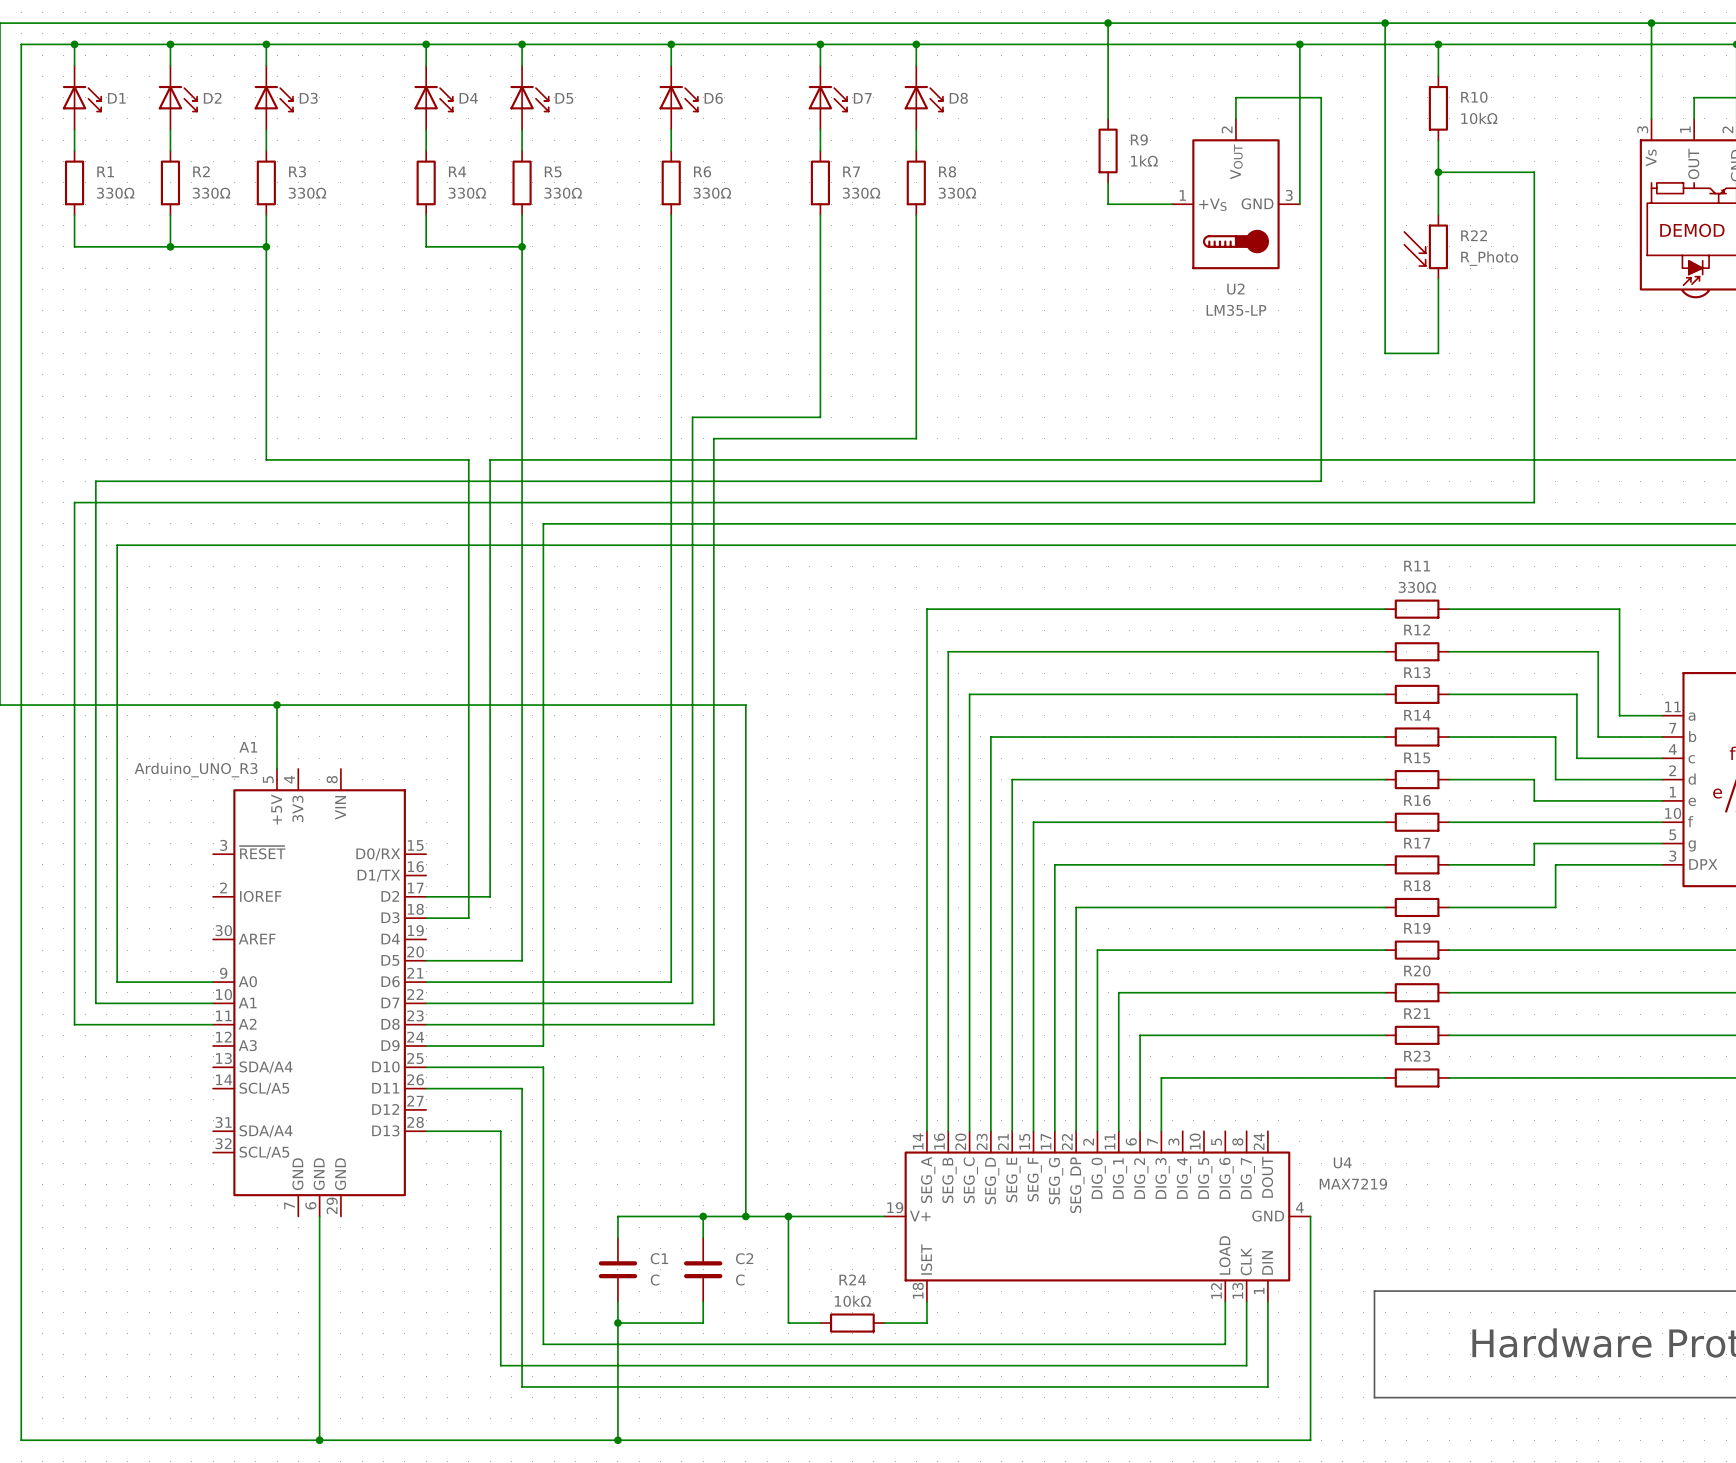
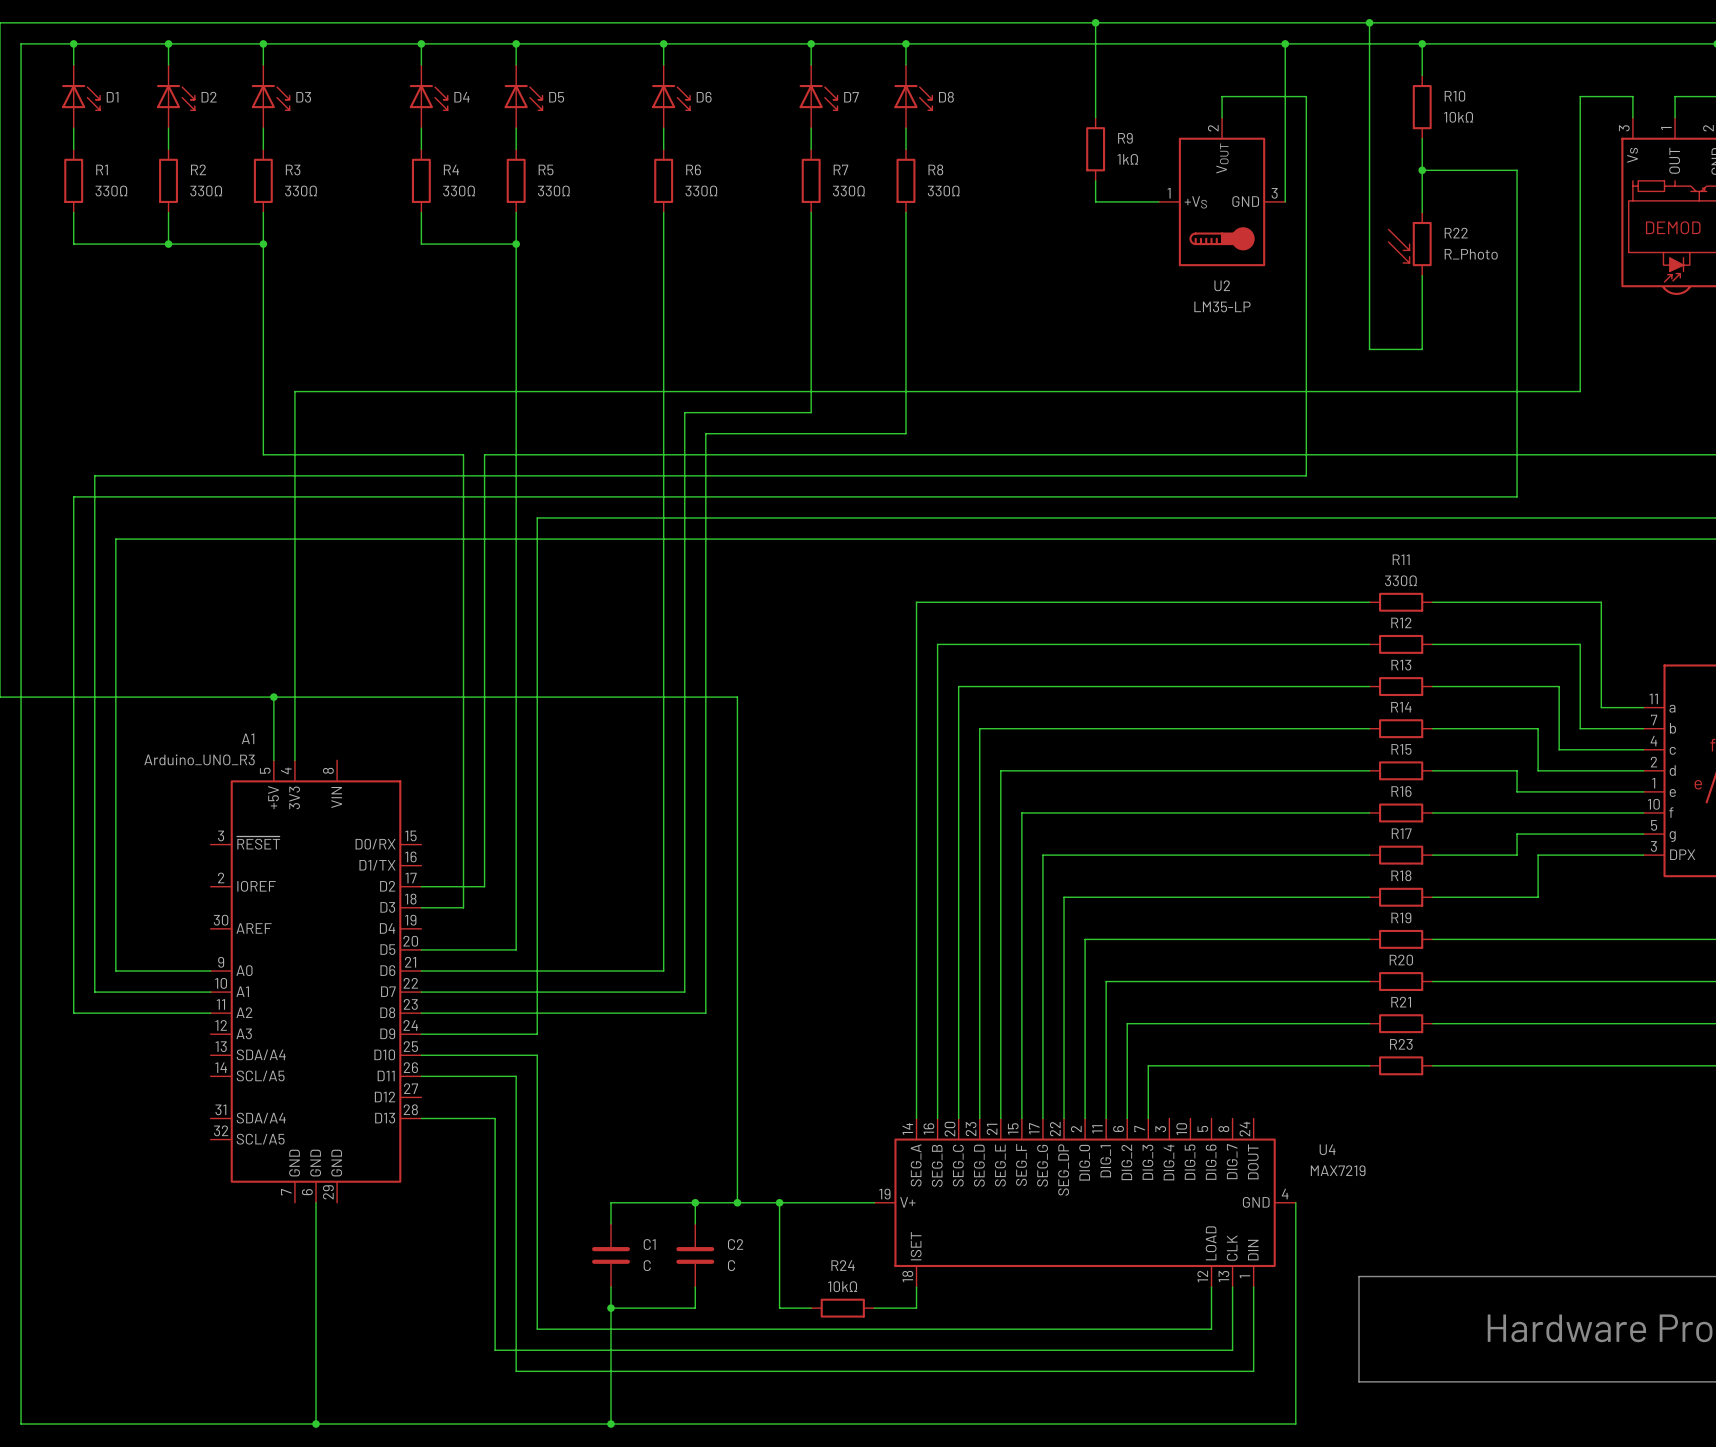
wire: (1651, 23) (1651, 97) -> (294, 760) (294, 391) (1580, 391) (1580, 96) (1632, 96)
junction: (1651, 23) -> none

